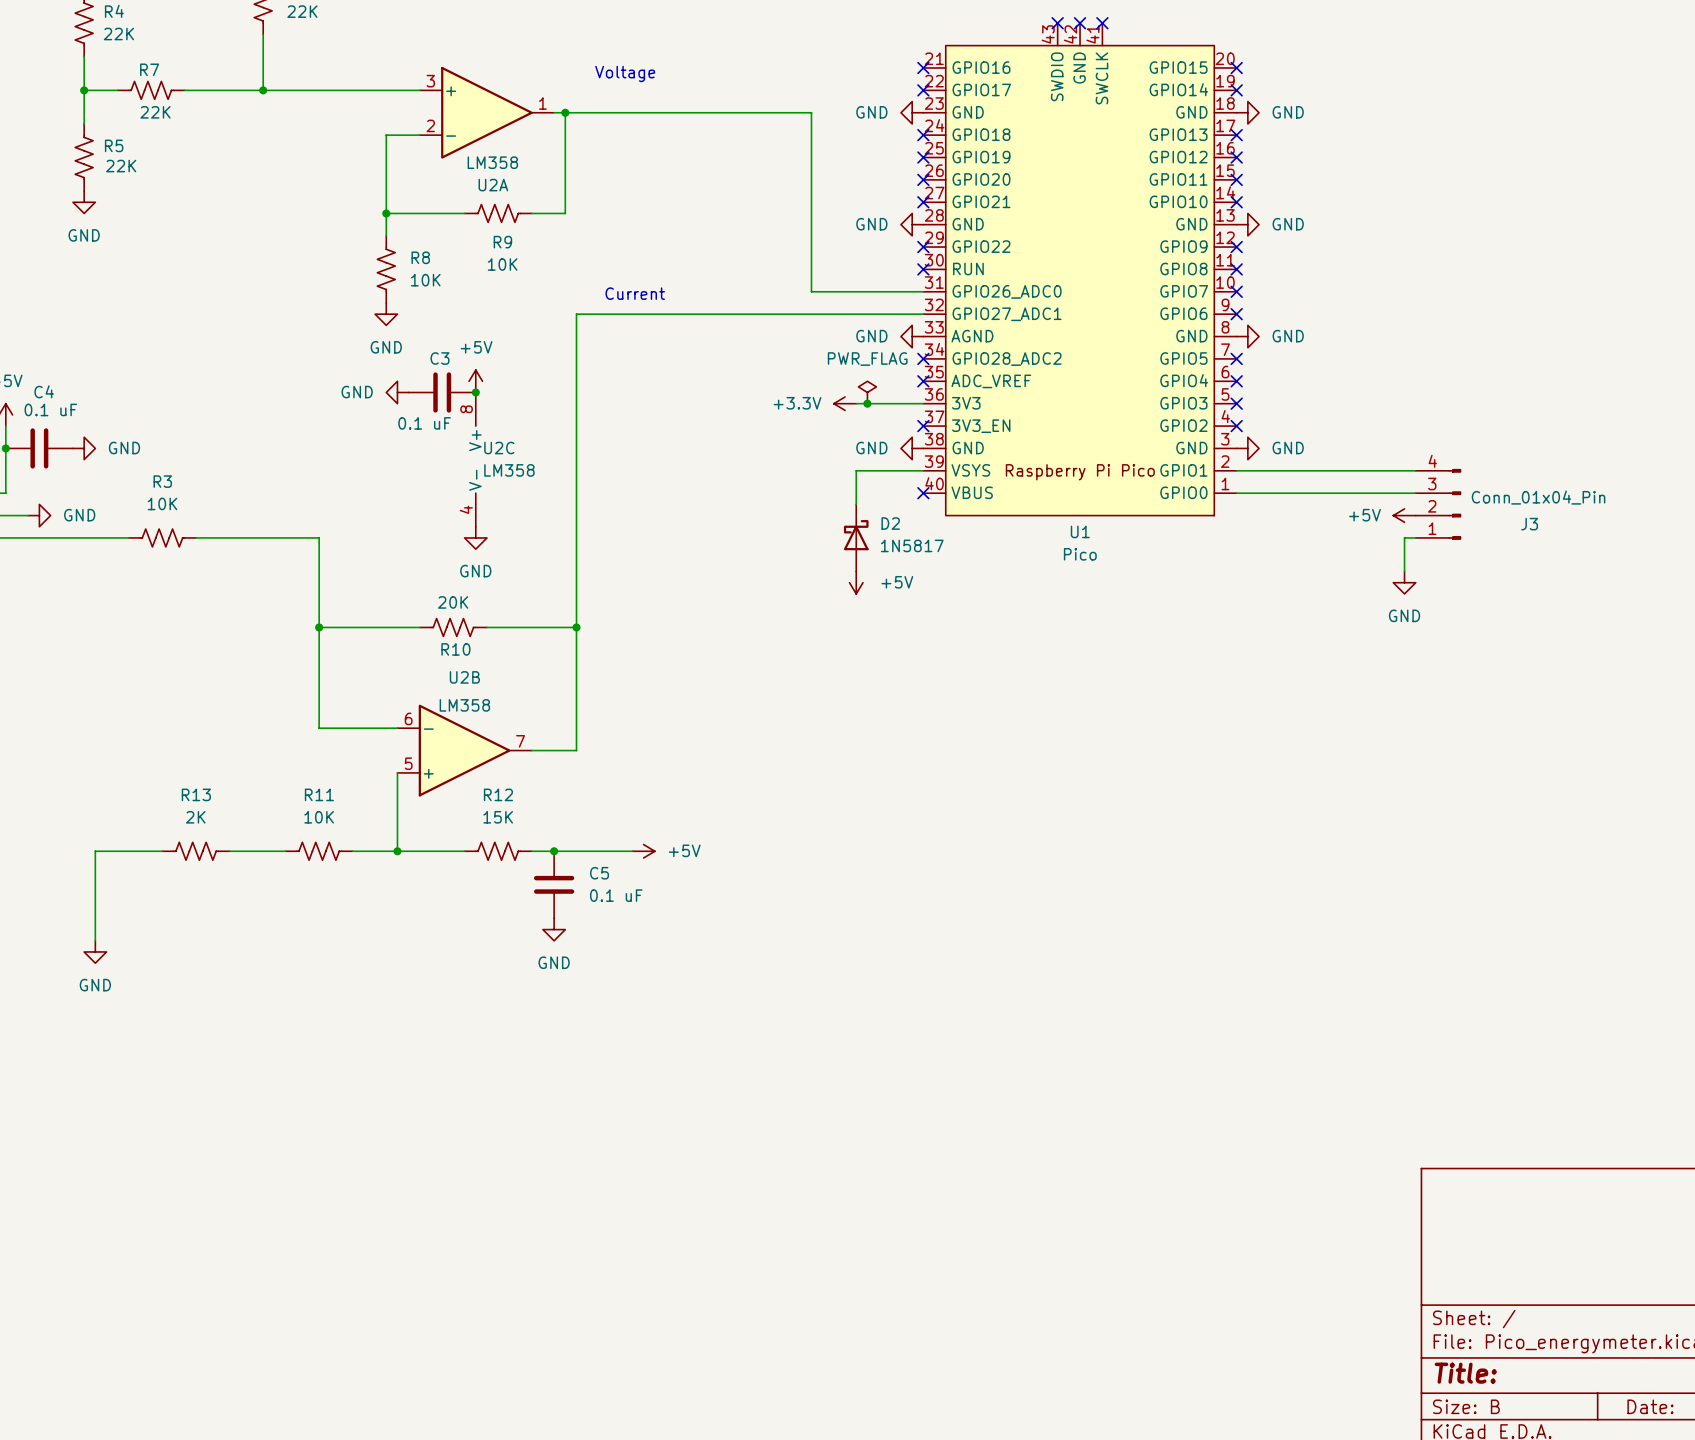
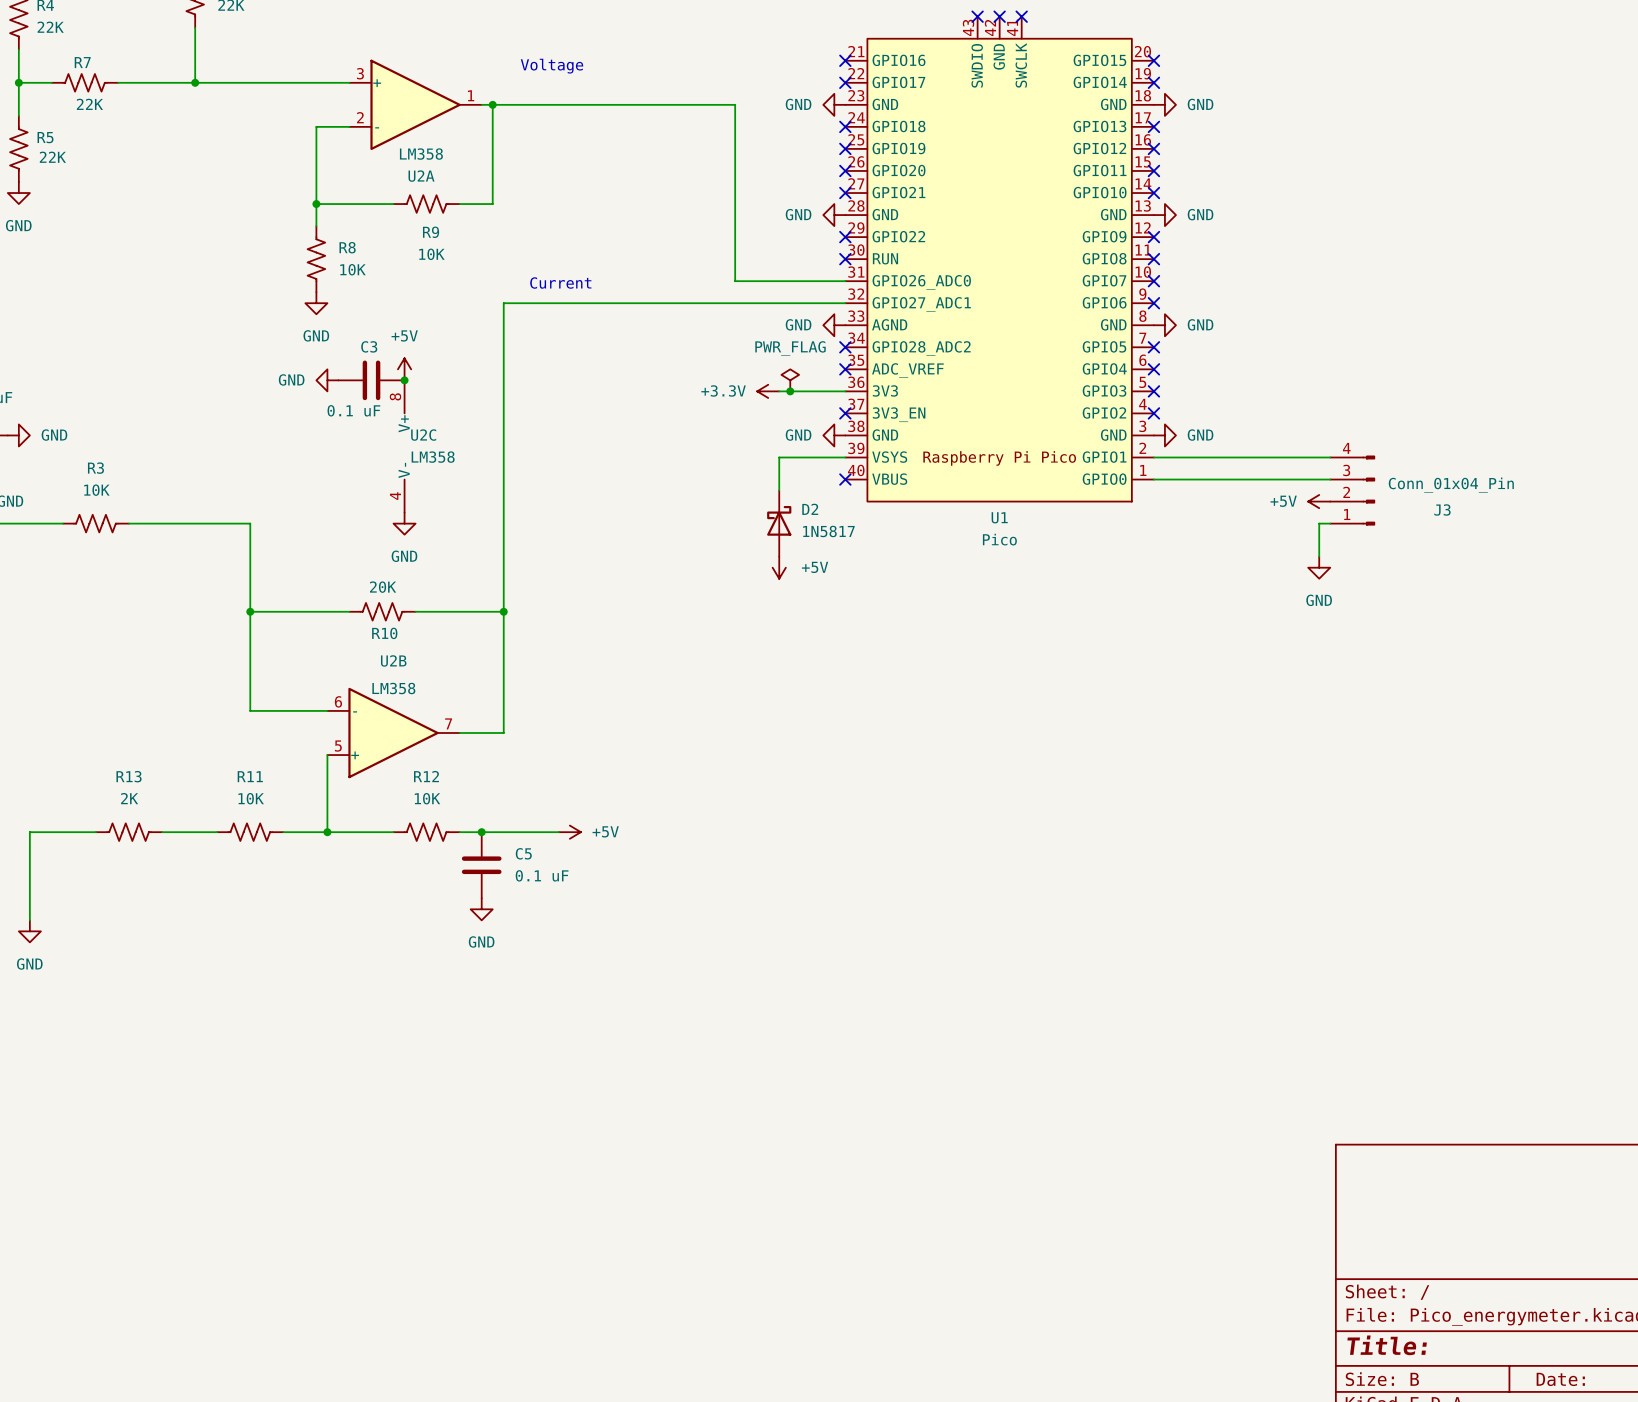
R12 value: 15K (498, 817) -> 10K (427, 798)

